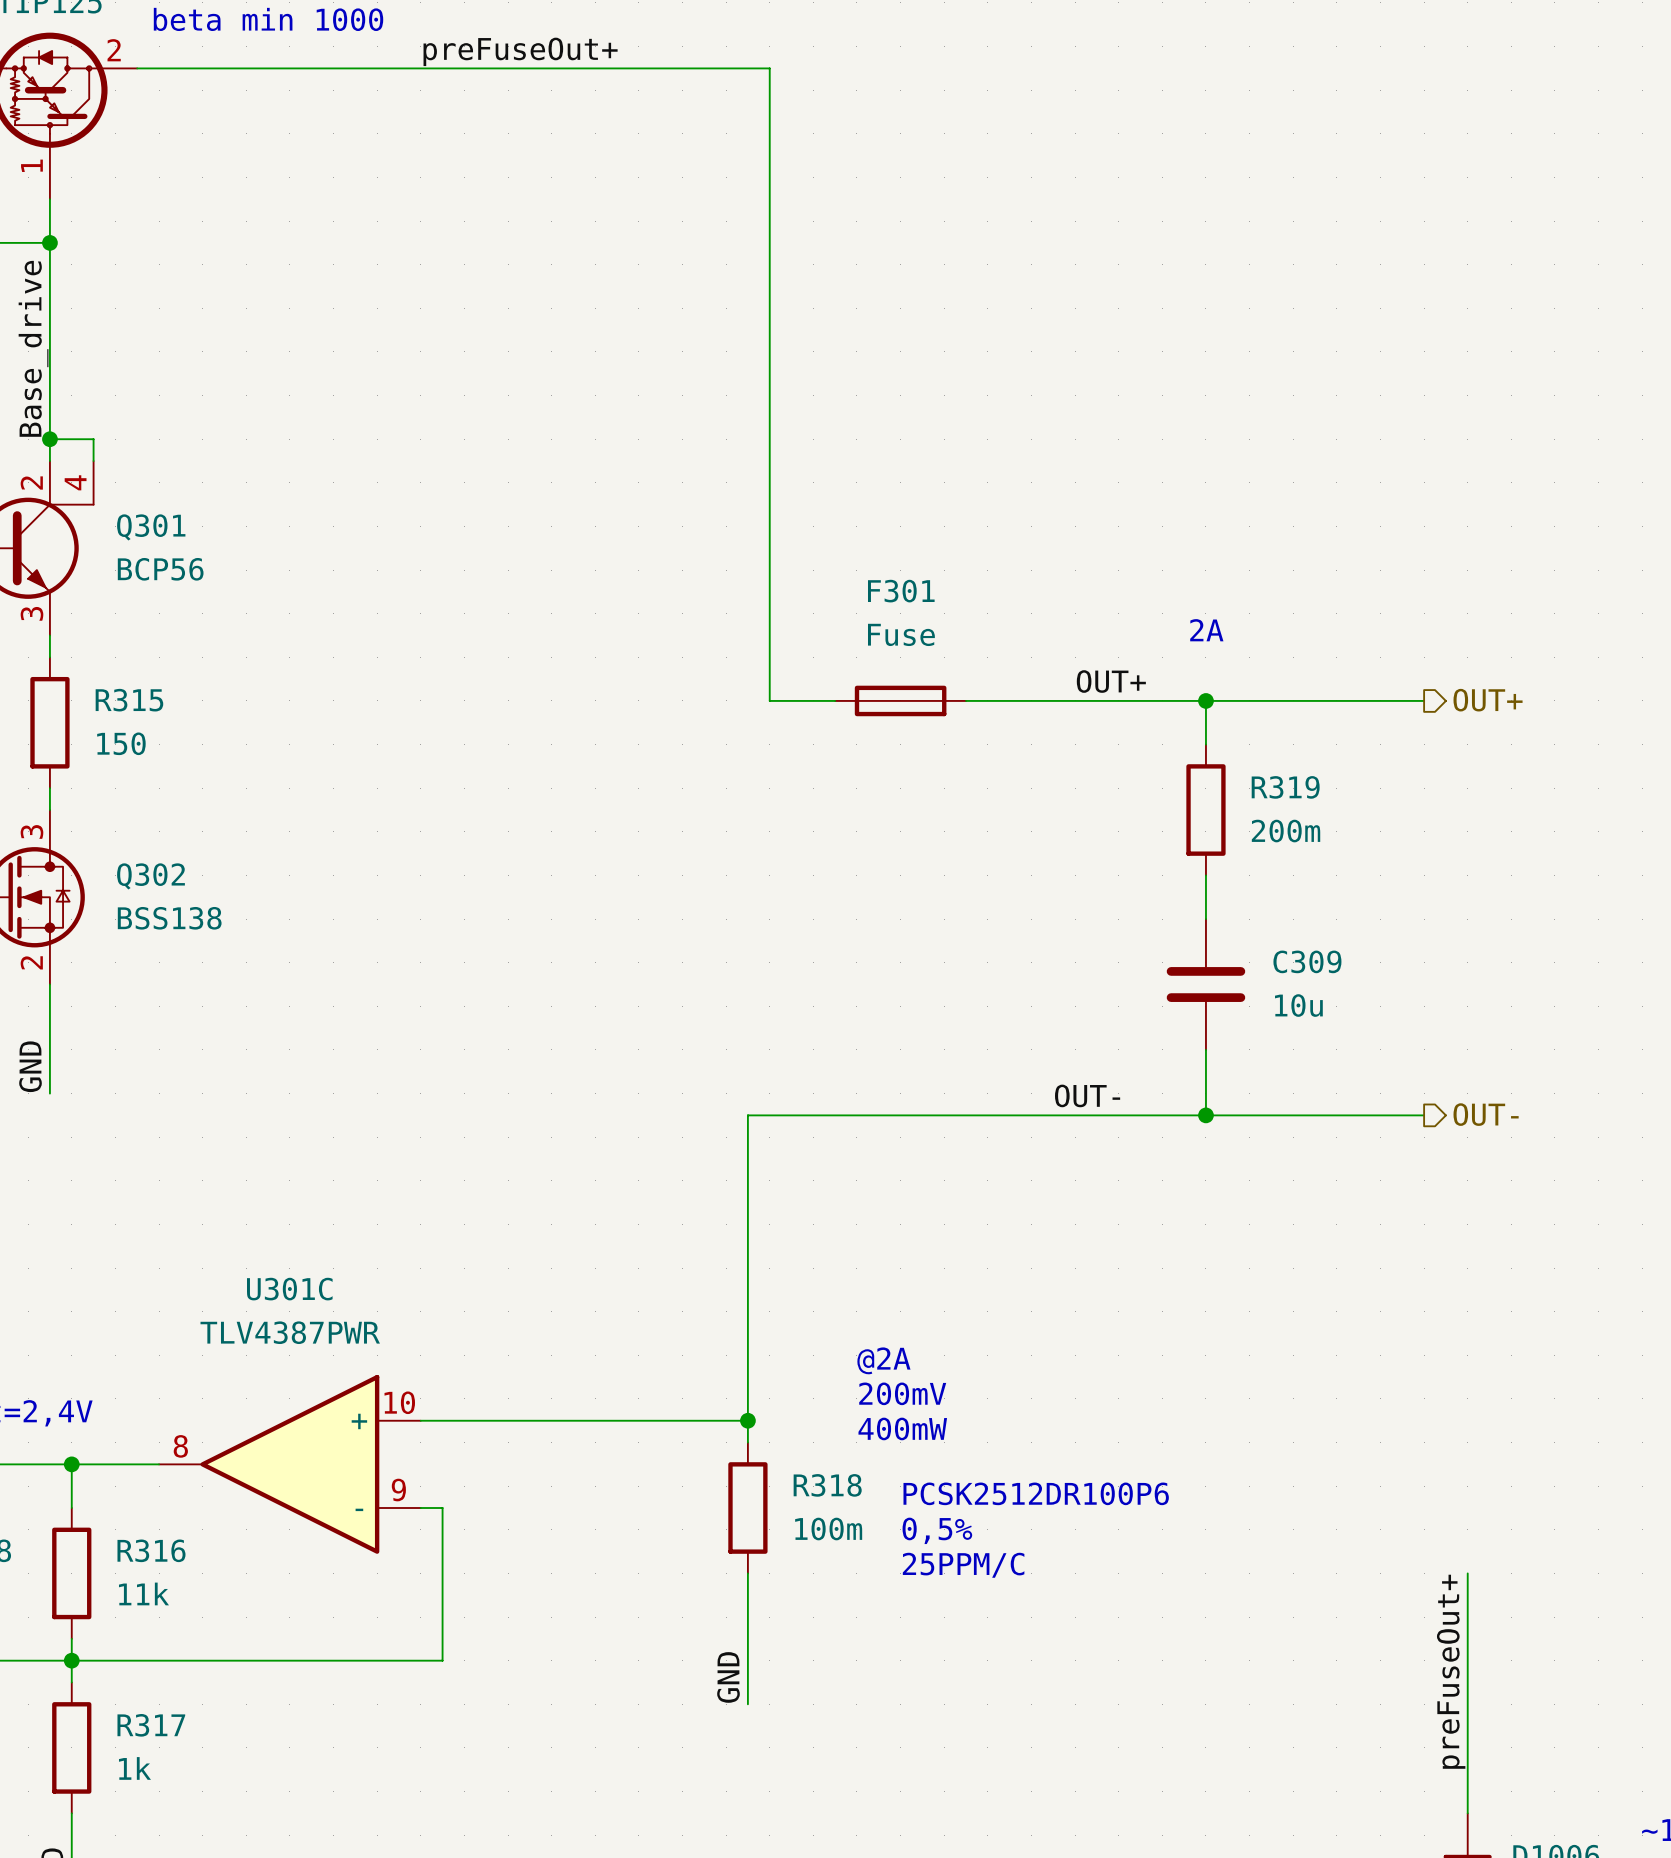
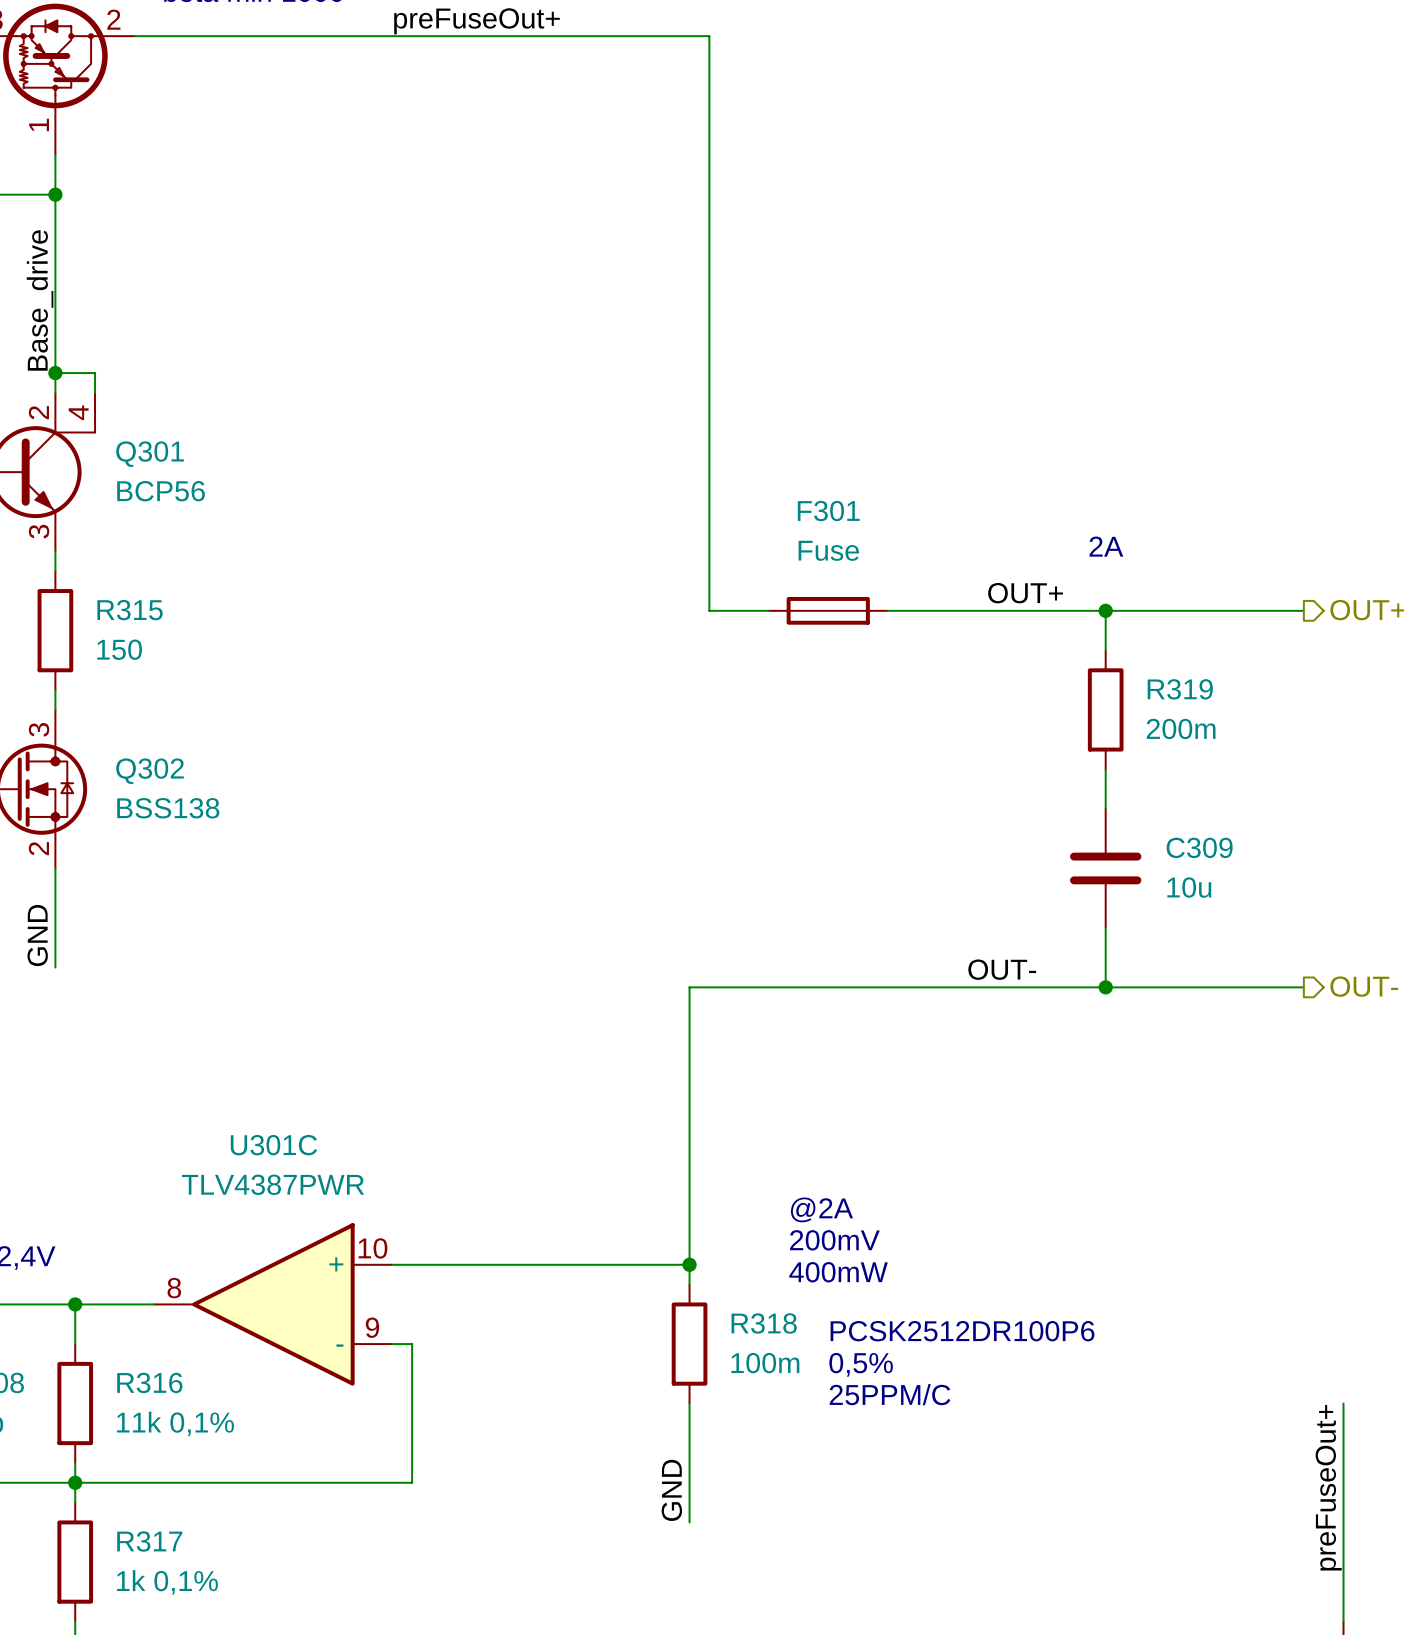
R316 value: 11k (143, 1593) -> 11k 0,1% (175, 1423)
R317 value: 1k (134, 1768) -> 1k 0,1% (167, 1582)

